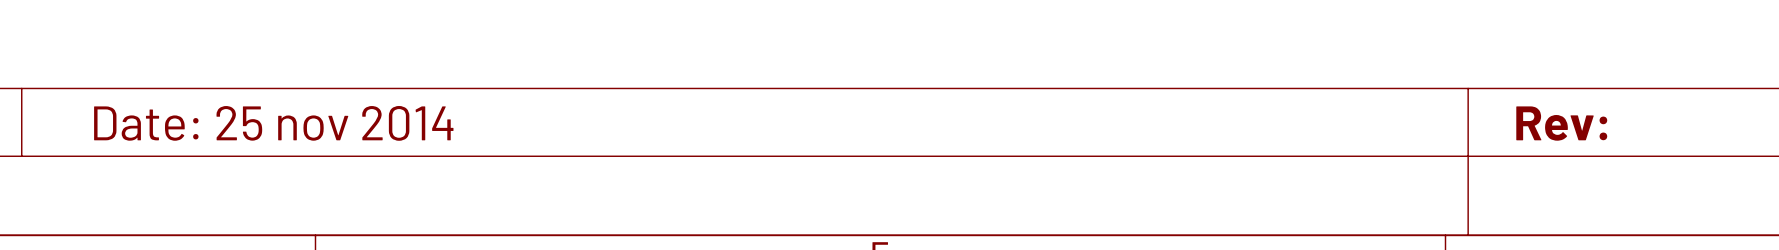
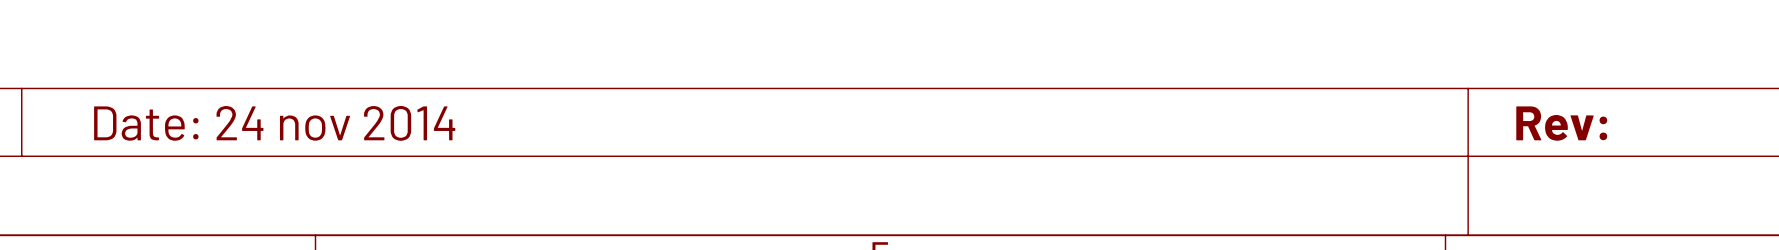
title block: Date: 25 nov 2014 (273, 123) -> Date: 24 nov 2014 (274, 123)

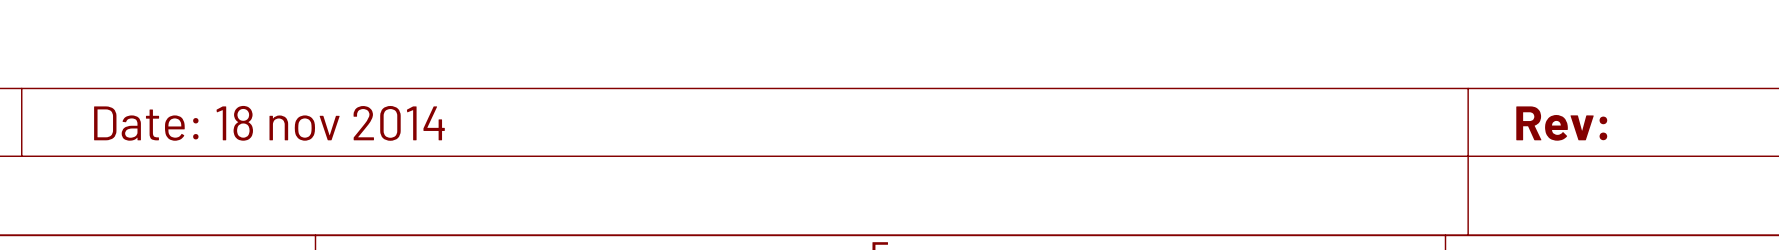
title block: Date: 24 nov 2014 (274, 123) -> Date: 18 nov 2014 (269, 123)

